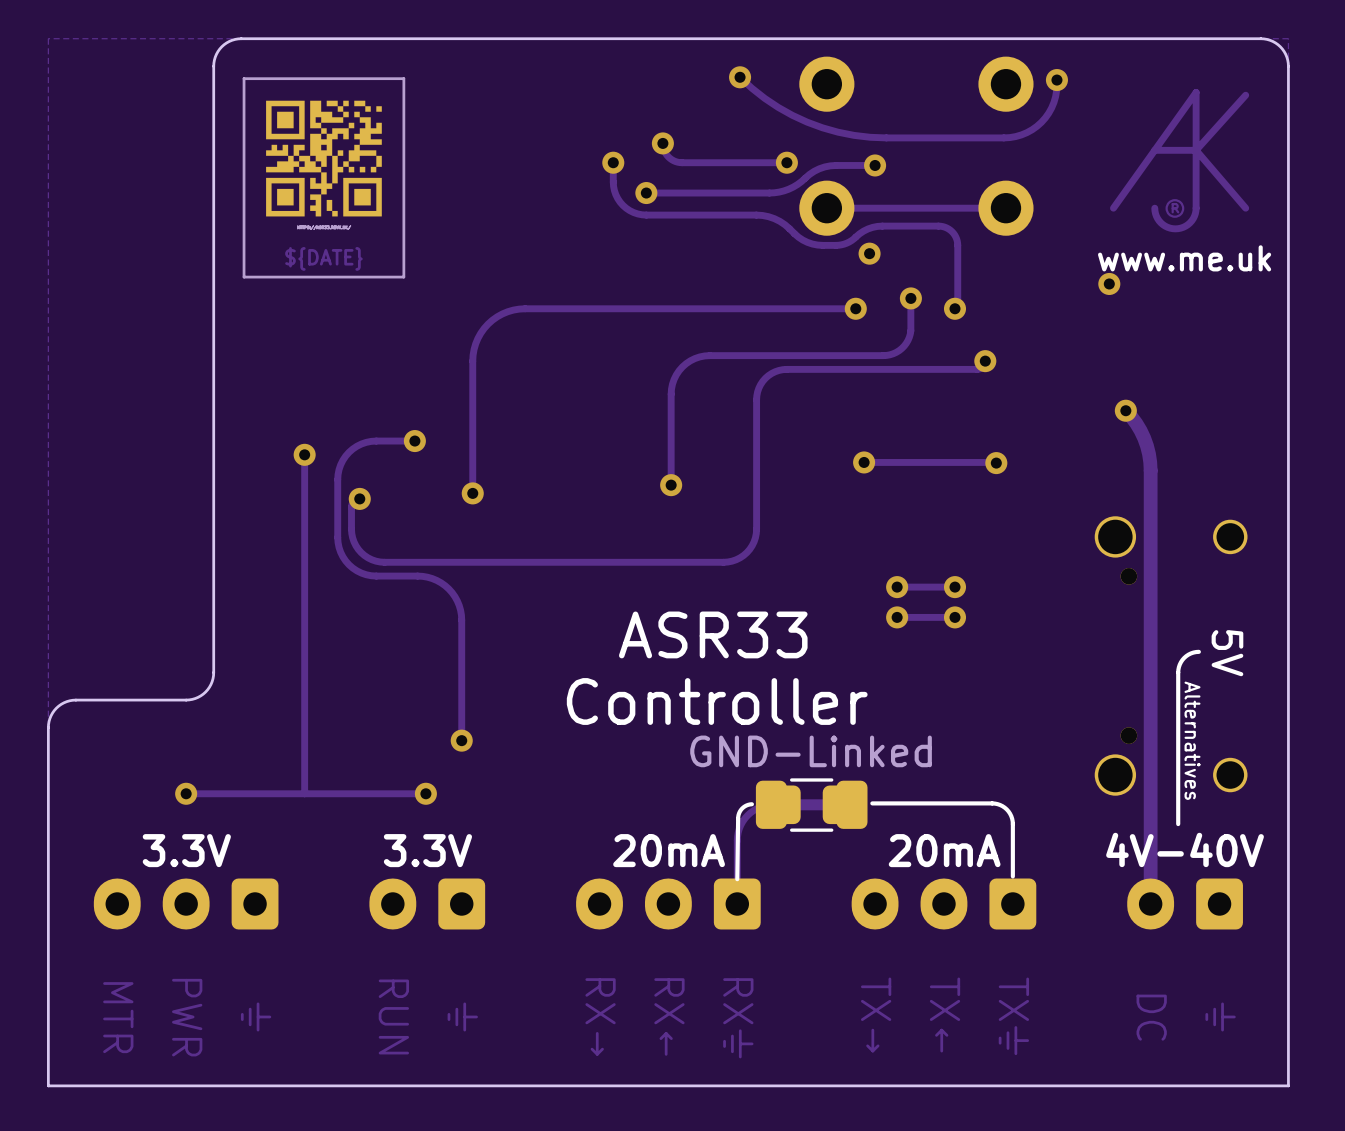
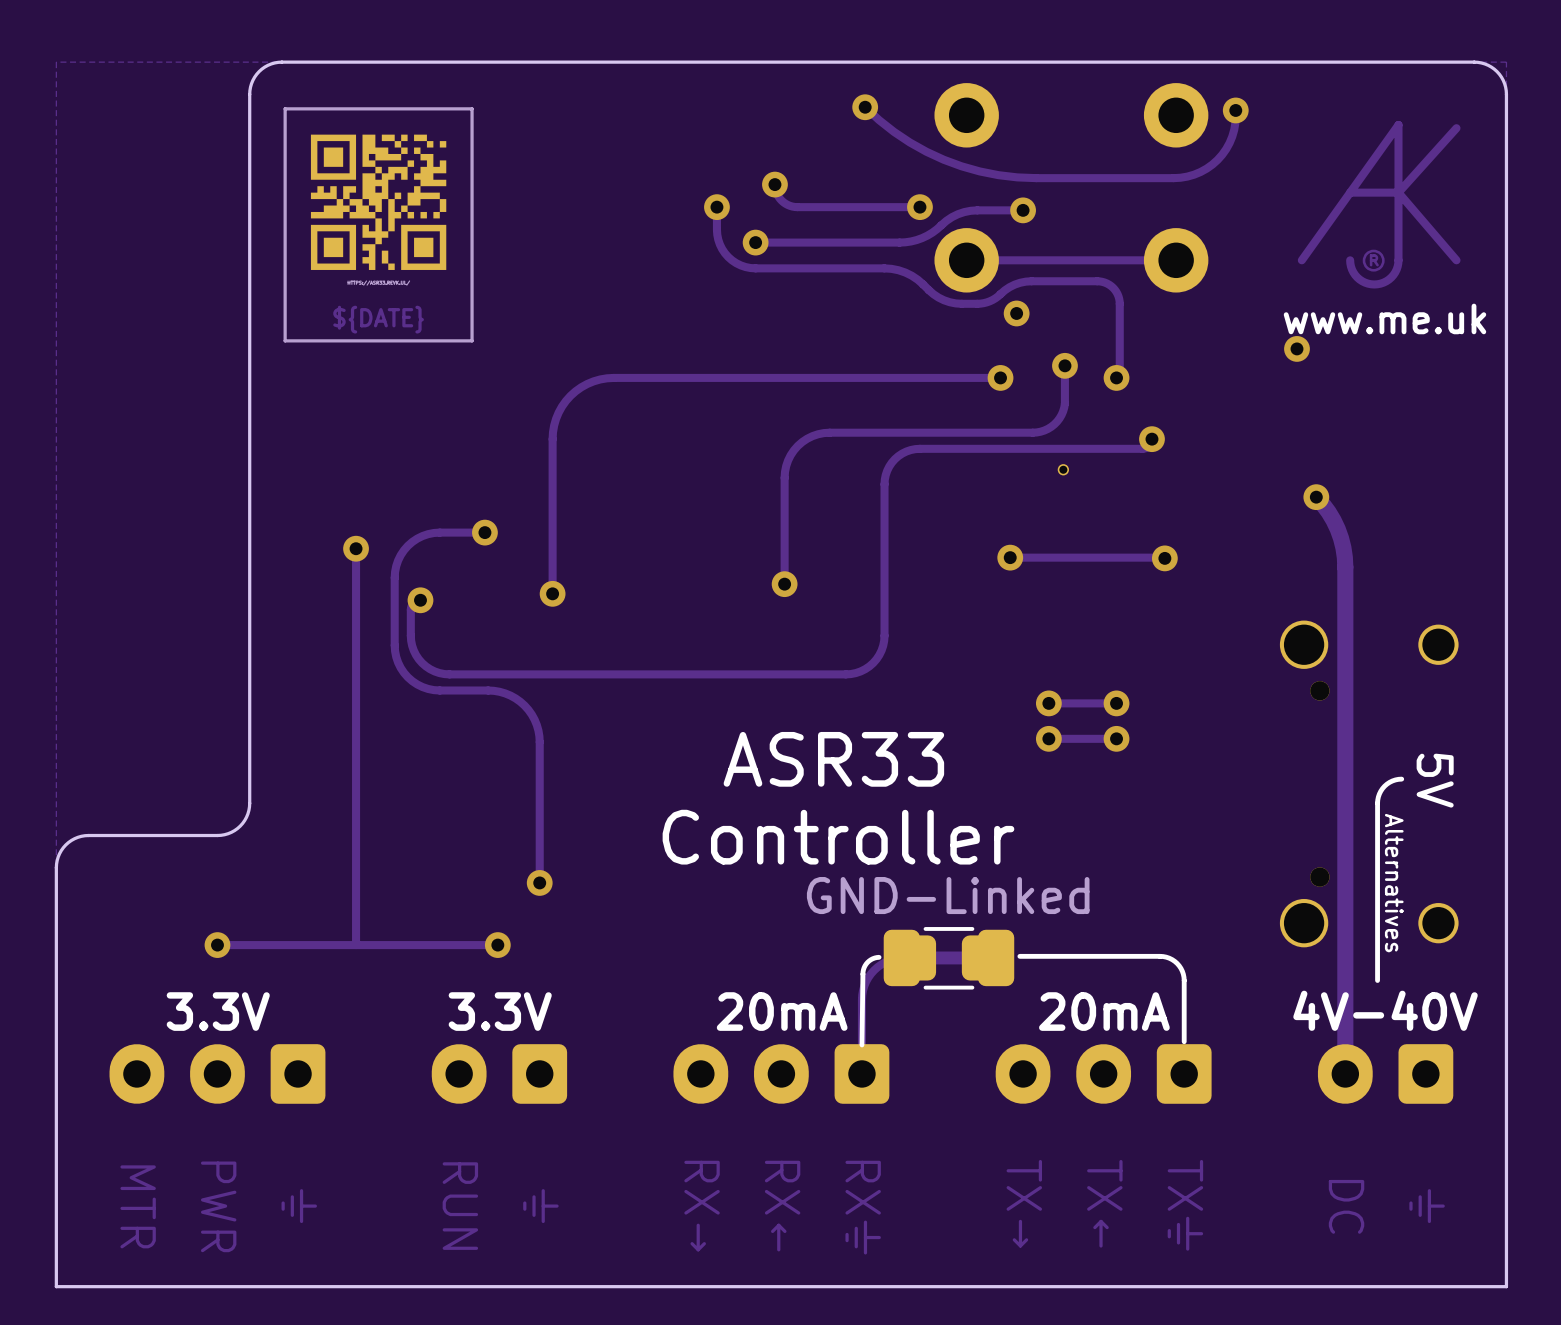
part footprint: [242, 77, 406, 279] -> [283, 107, 474, 343]
part: none -> (1063, 469)

